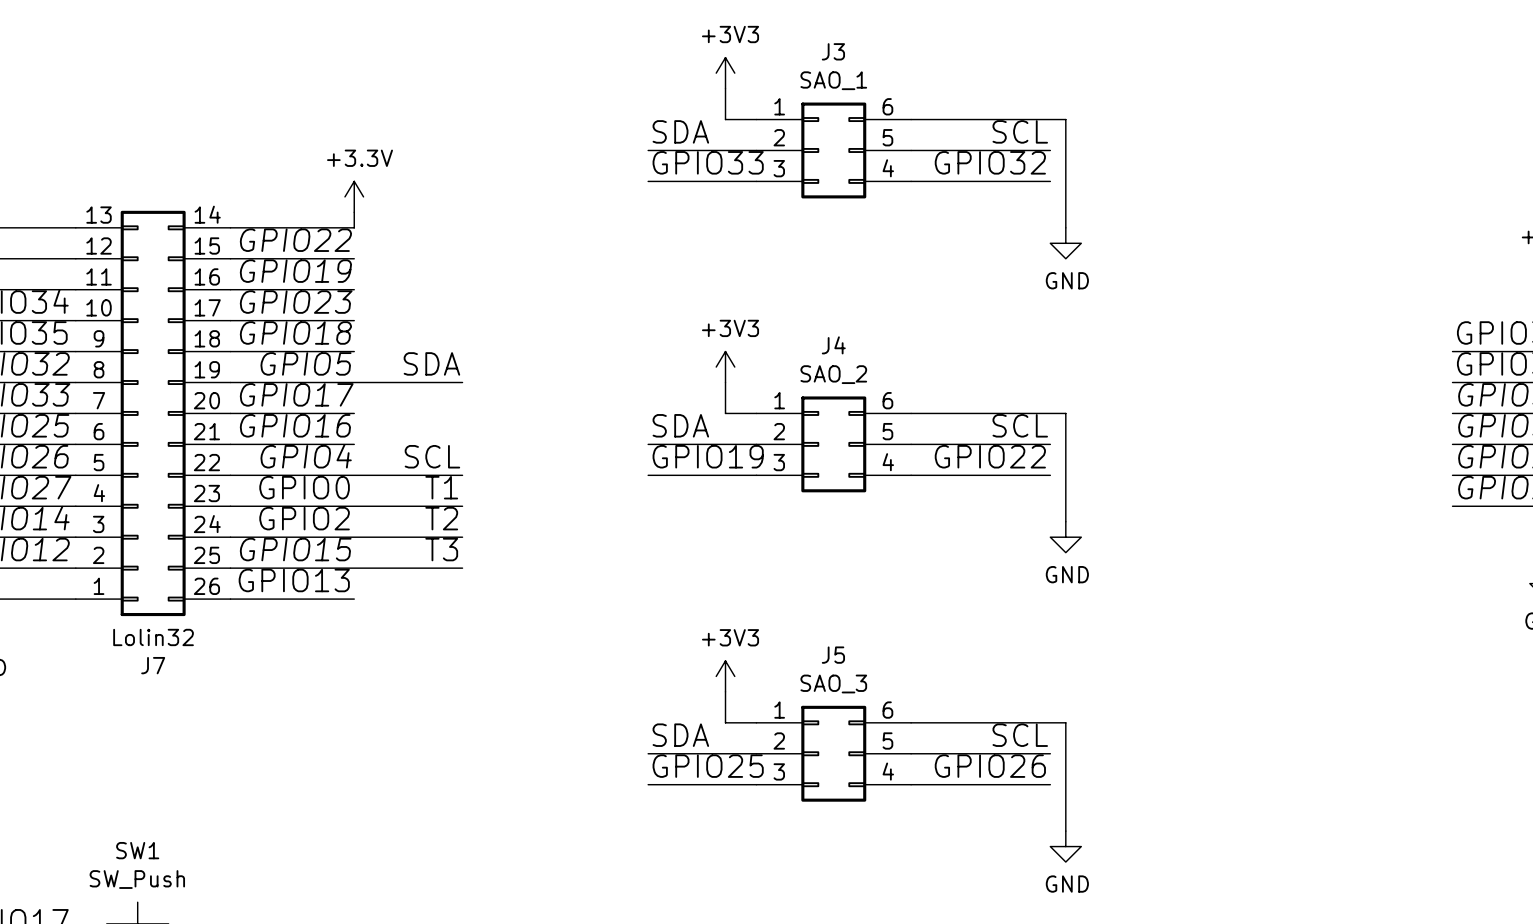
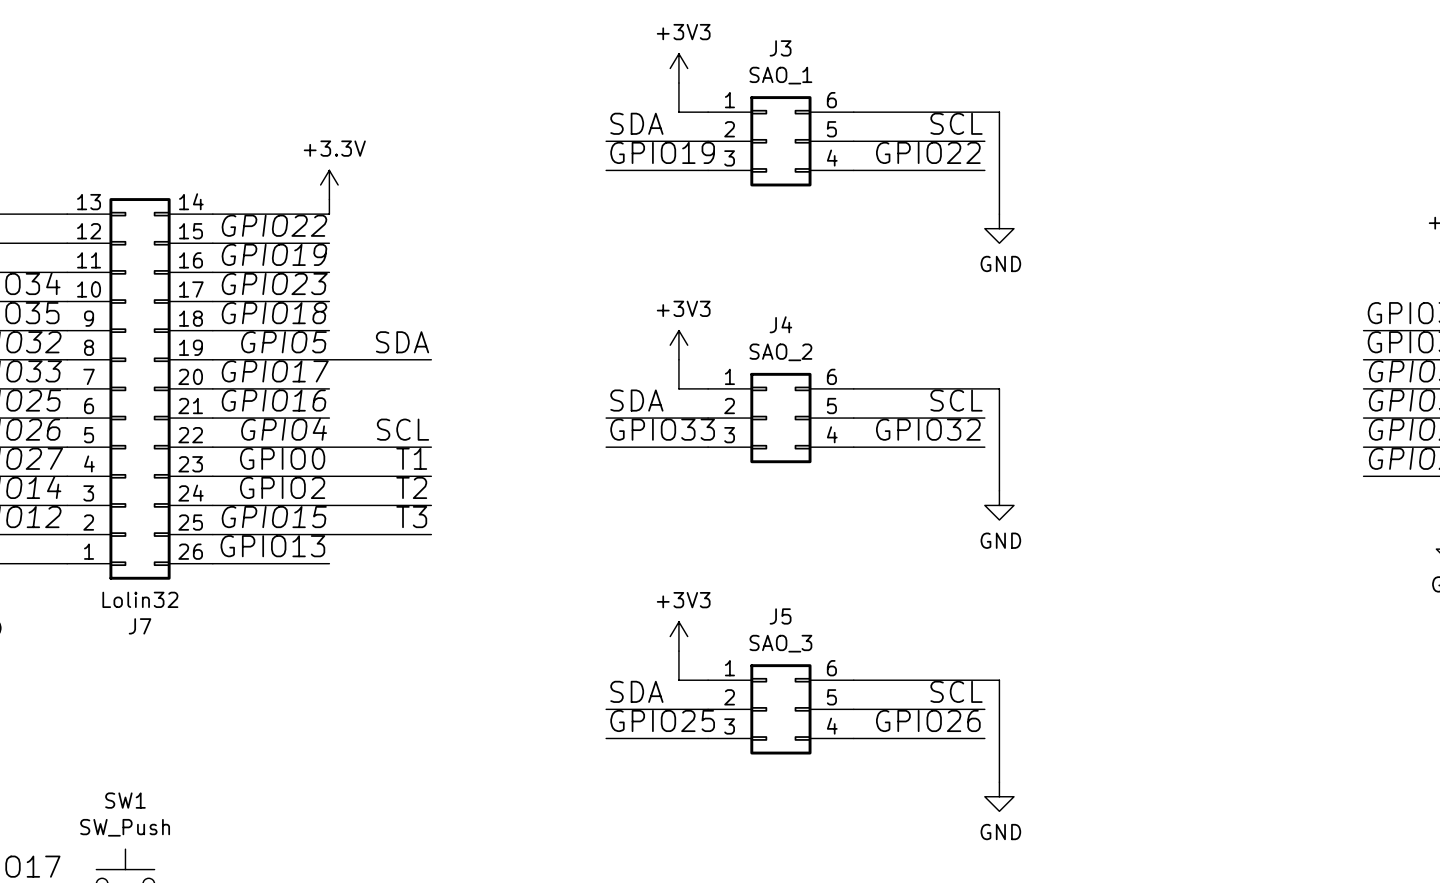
label: GPIO33 (708, 162) -> GPIO19 (662, 152)
label: GPIO32 (990, 162) -> GPIO22 (928, 152)
label: GPIO19 (708, 456) -> GPIO33 (662, 429)
label: GPIO22 (990, 456) -> GPIO32 (928, 429)

